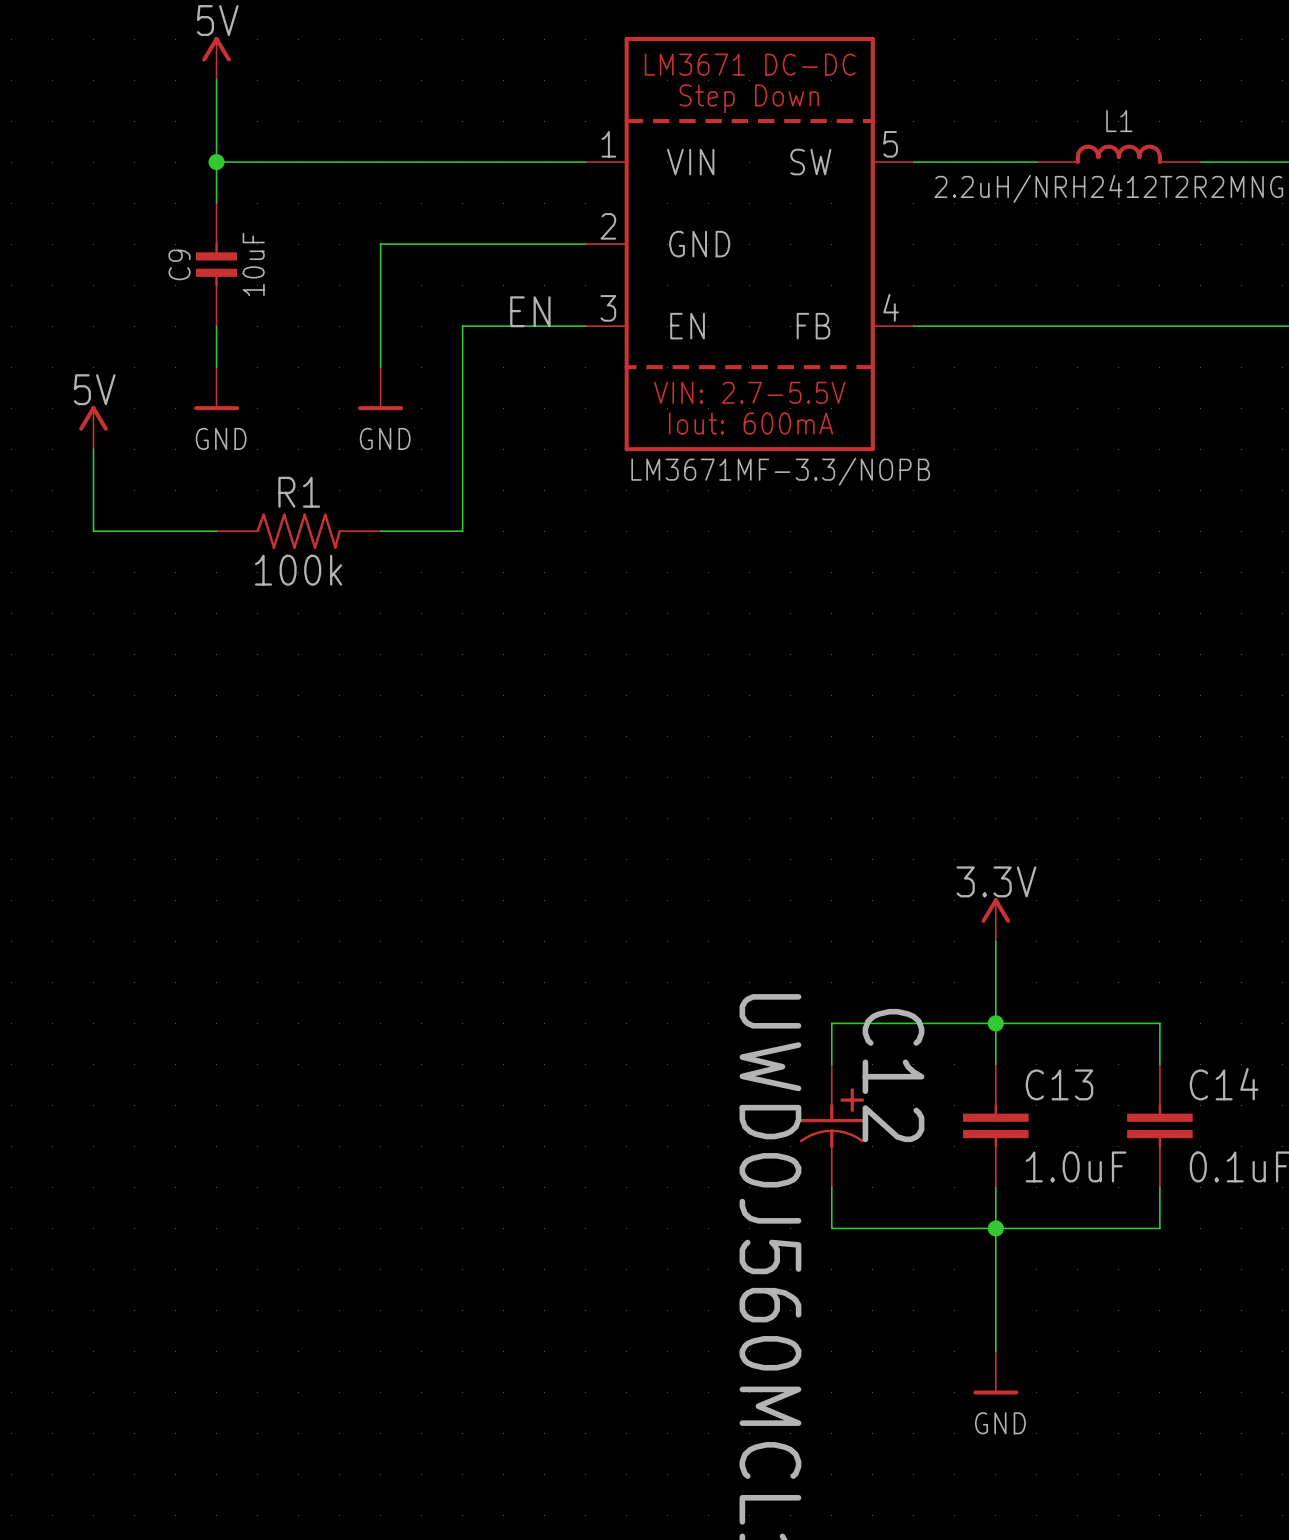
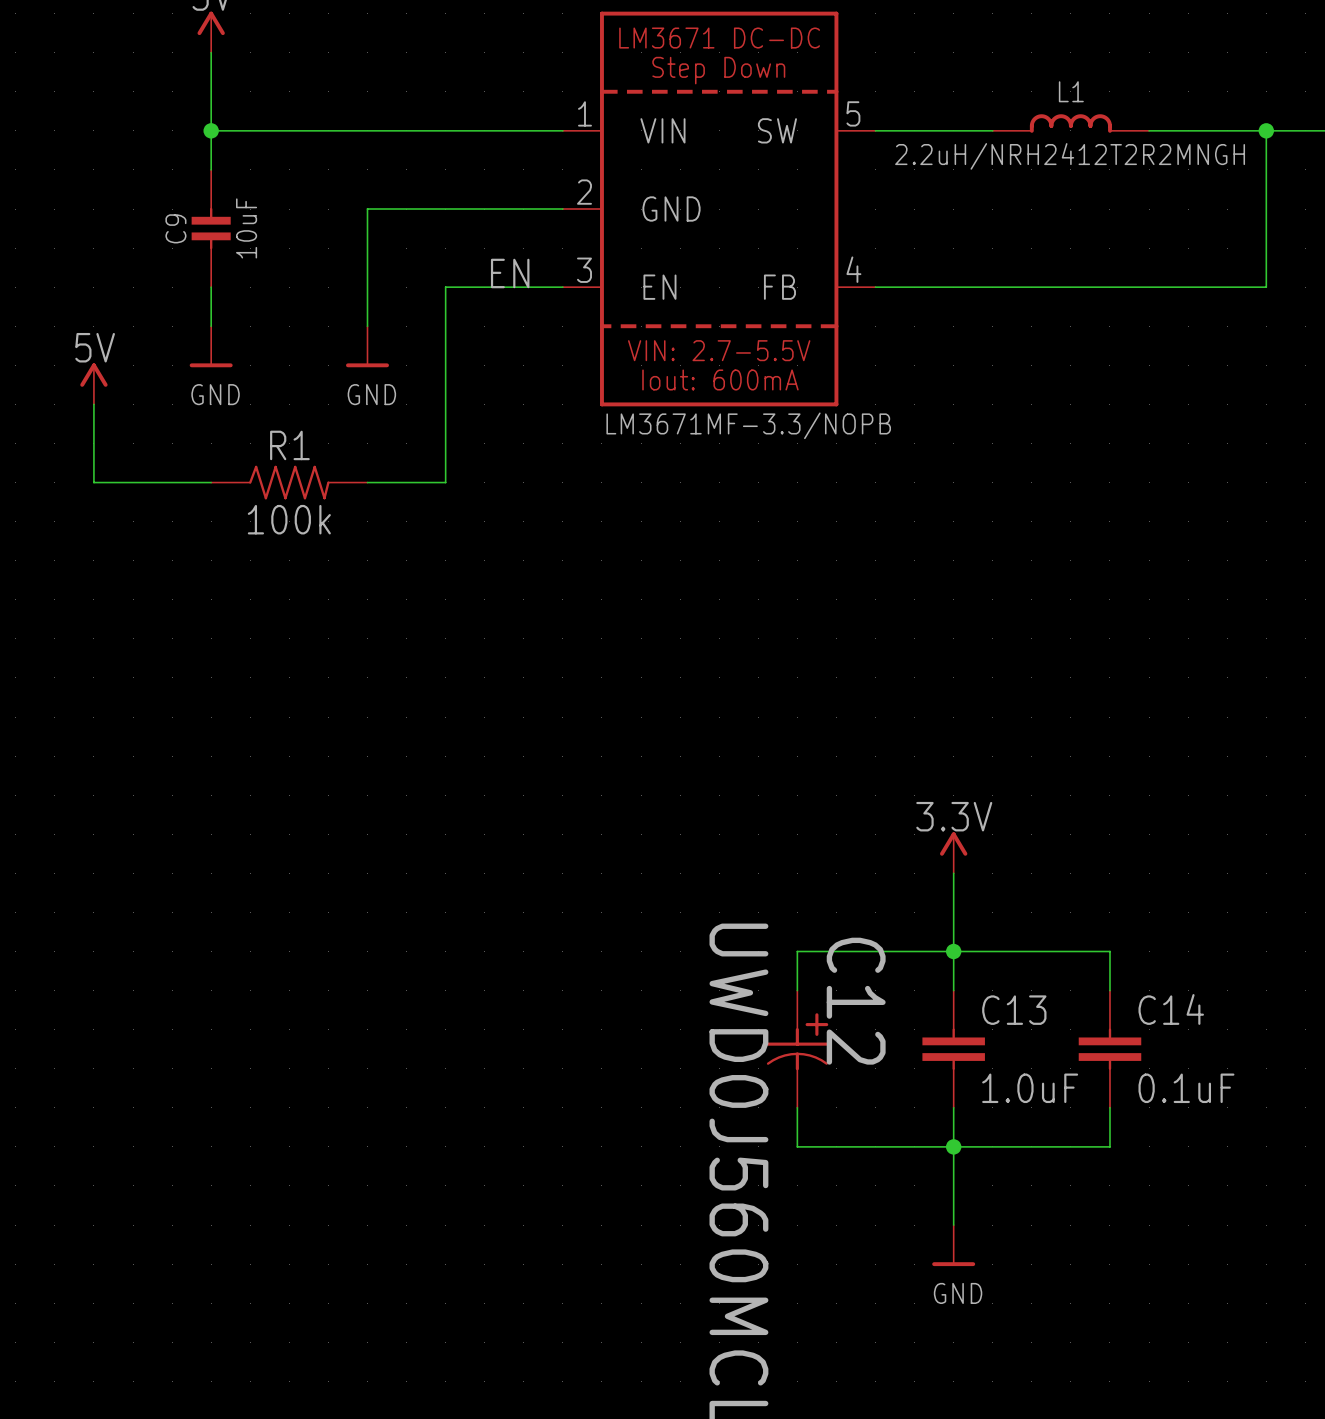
power symbol position: GND (995, 1373) -> GND (953, 1245)

